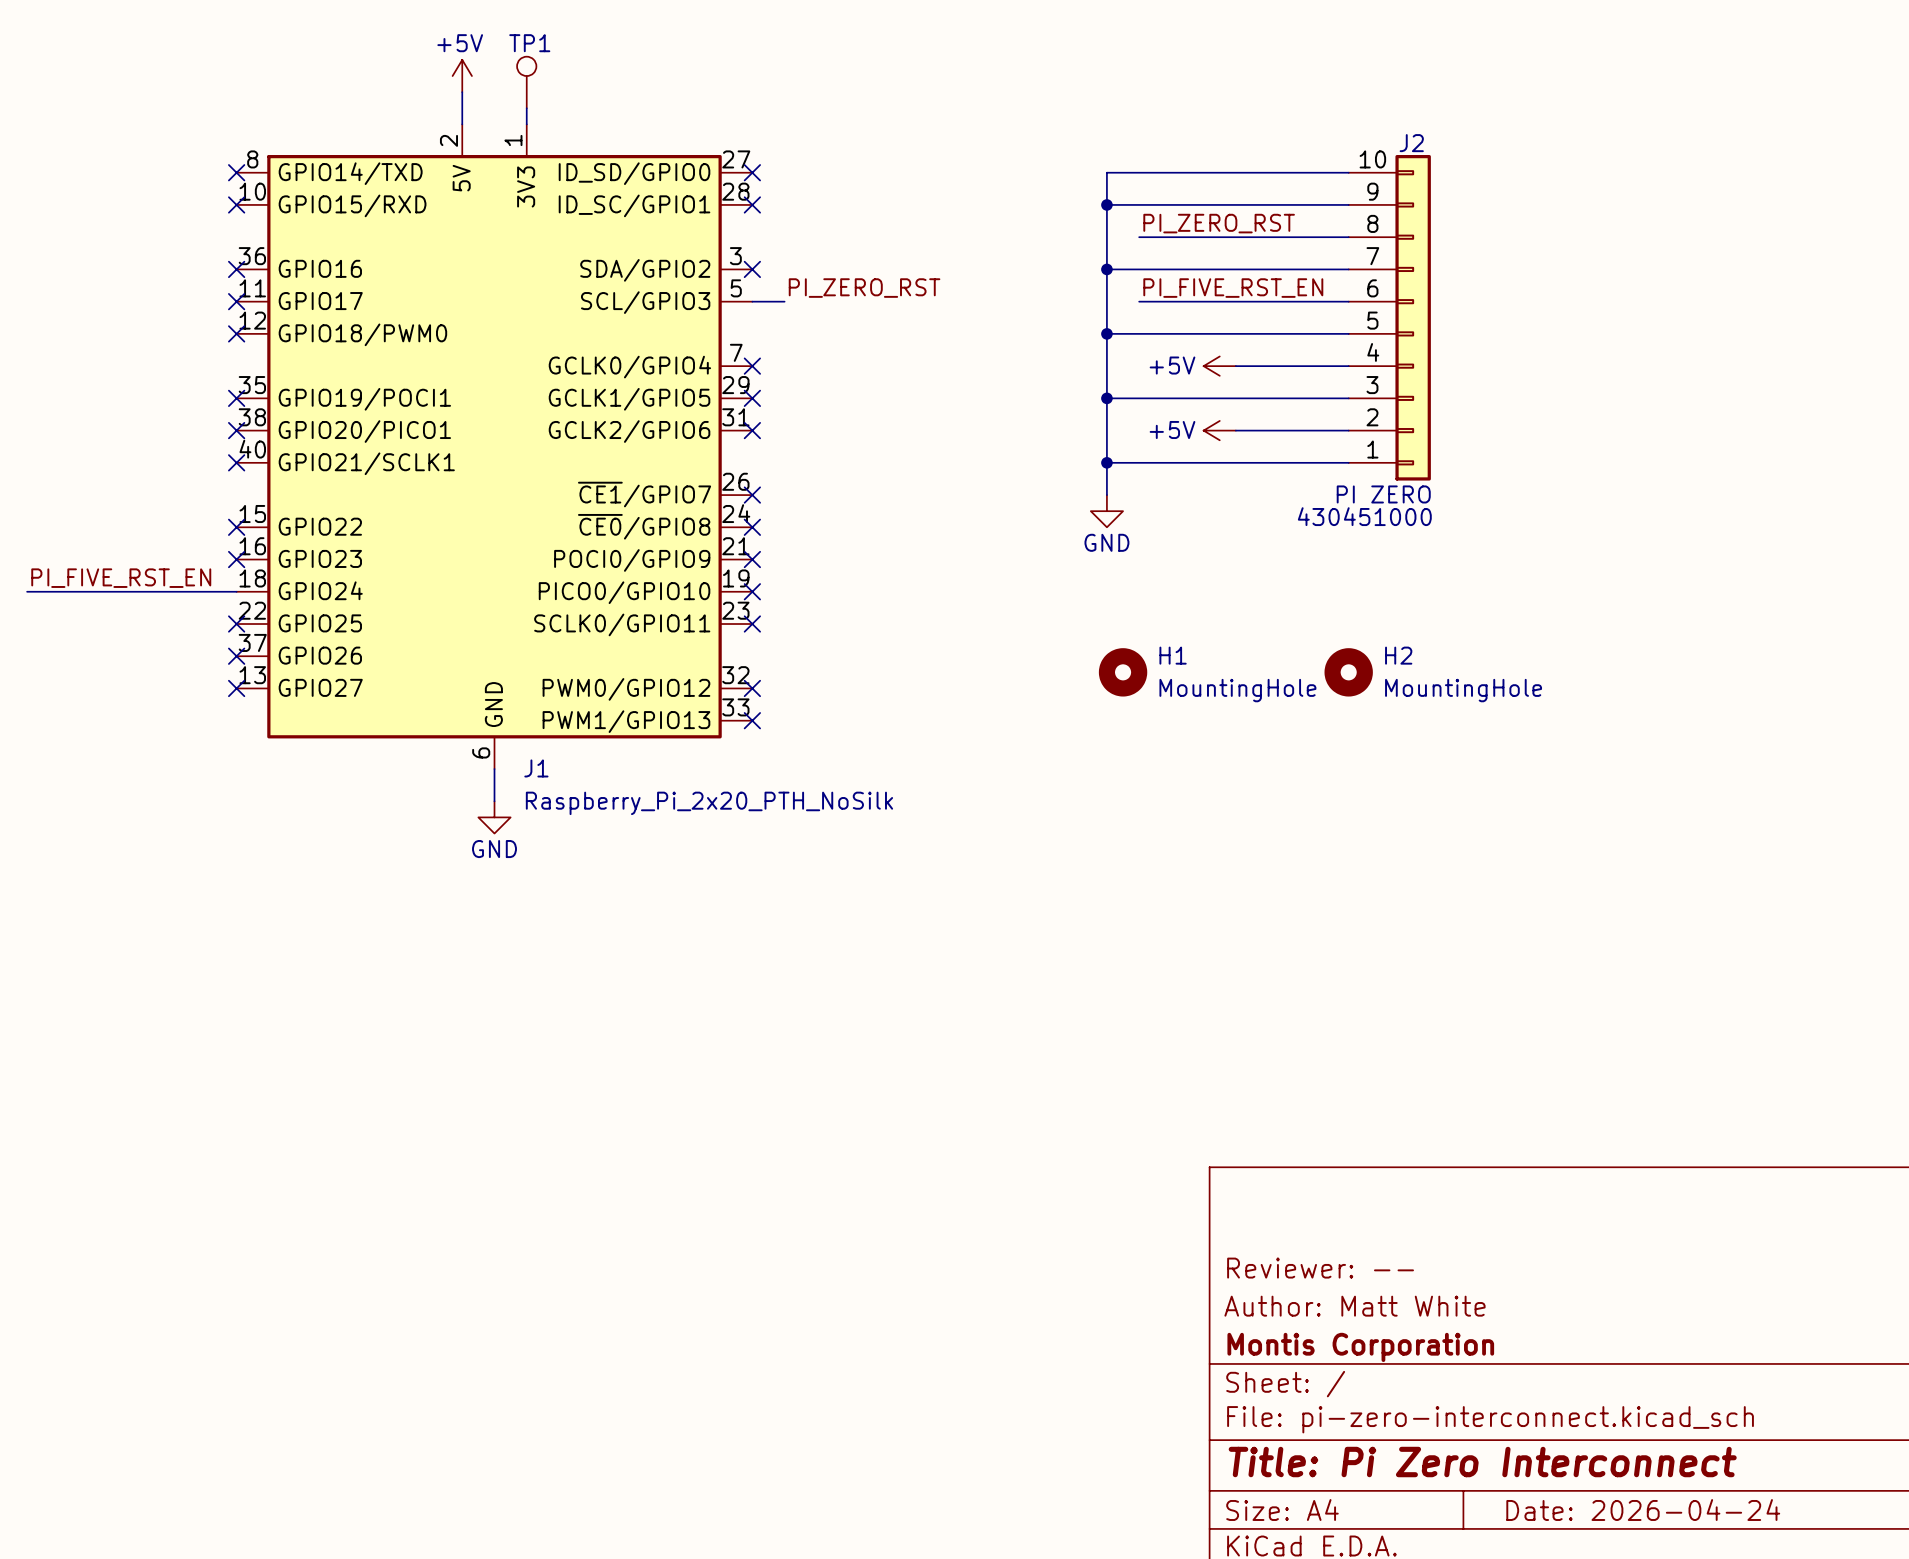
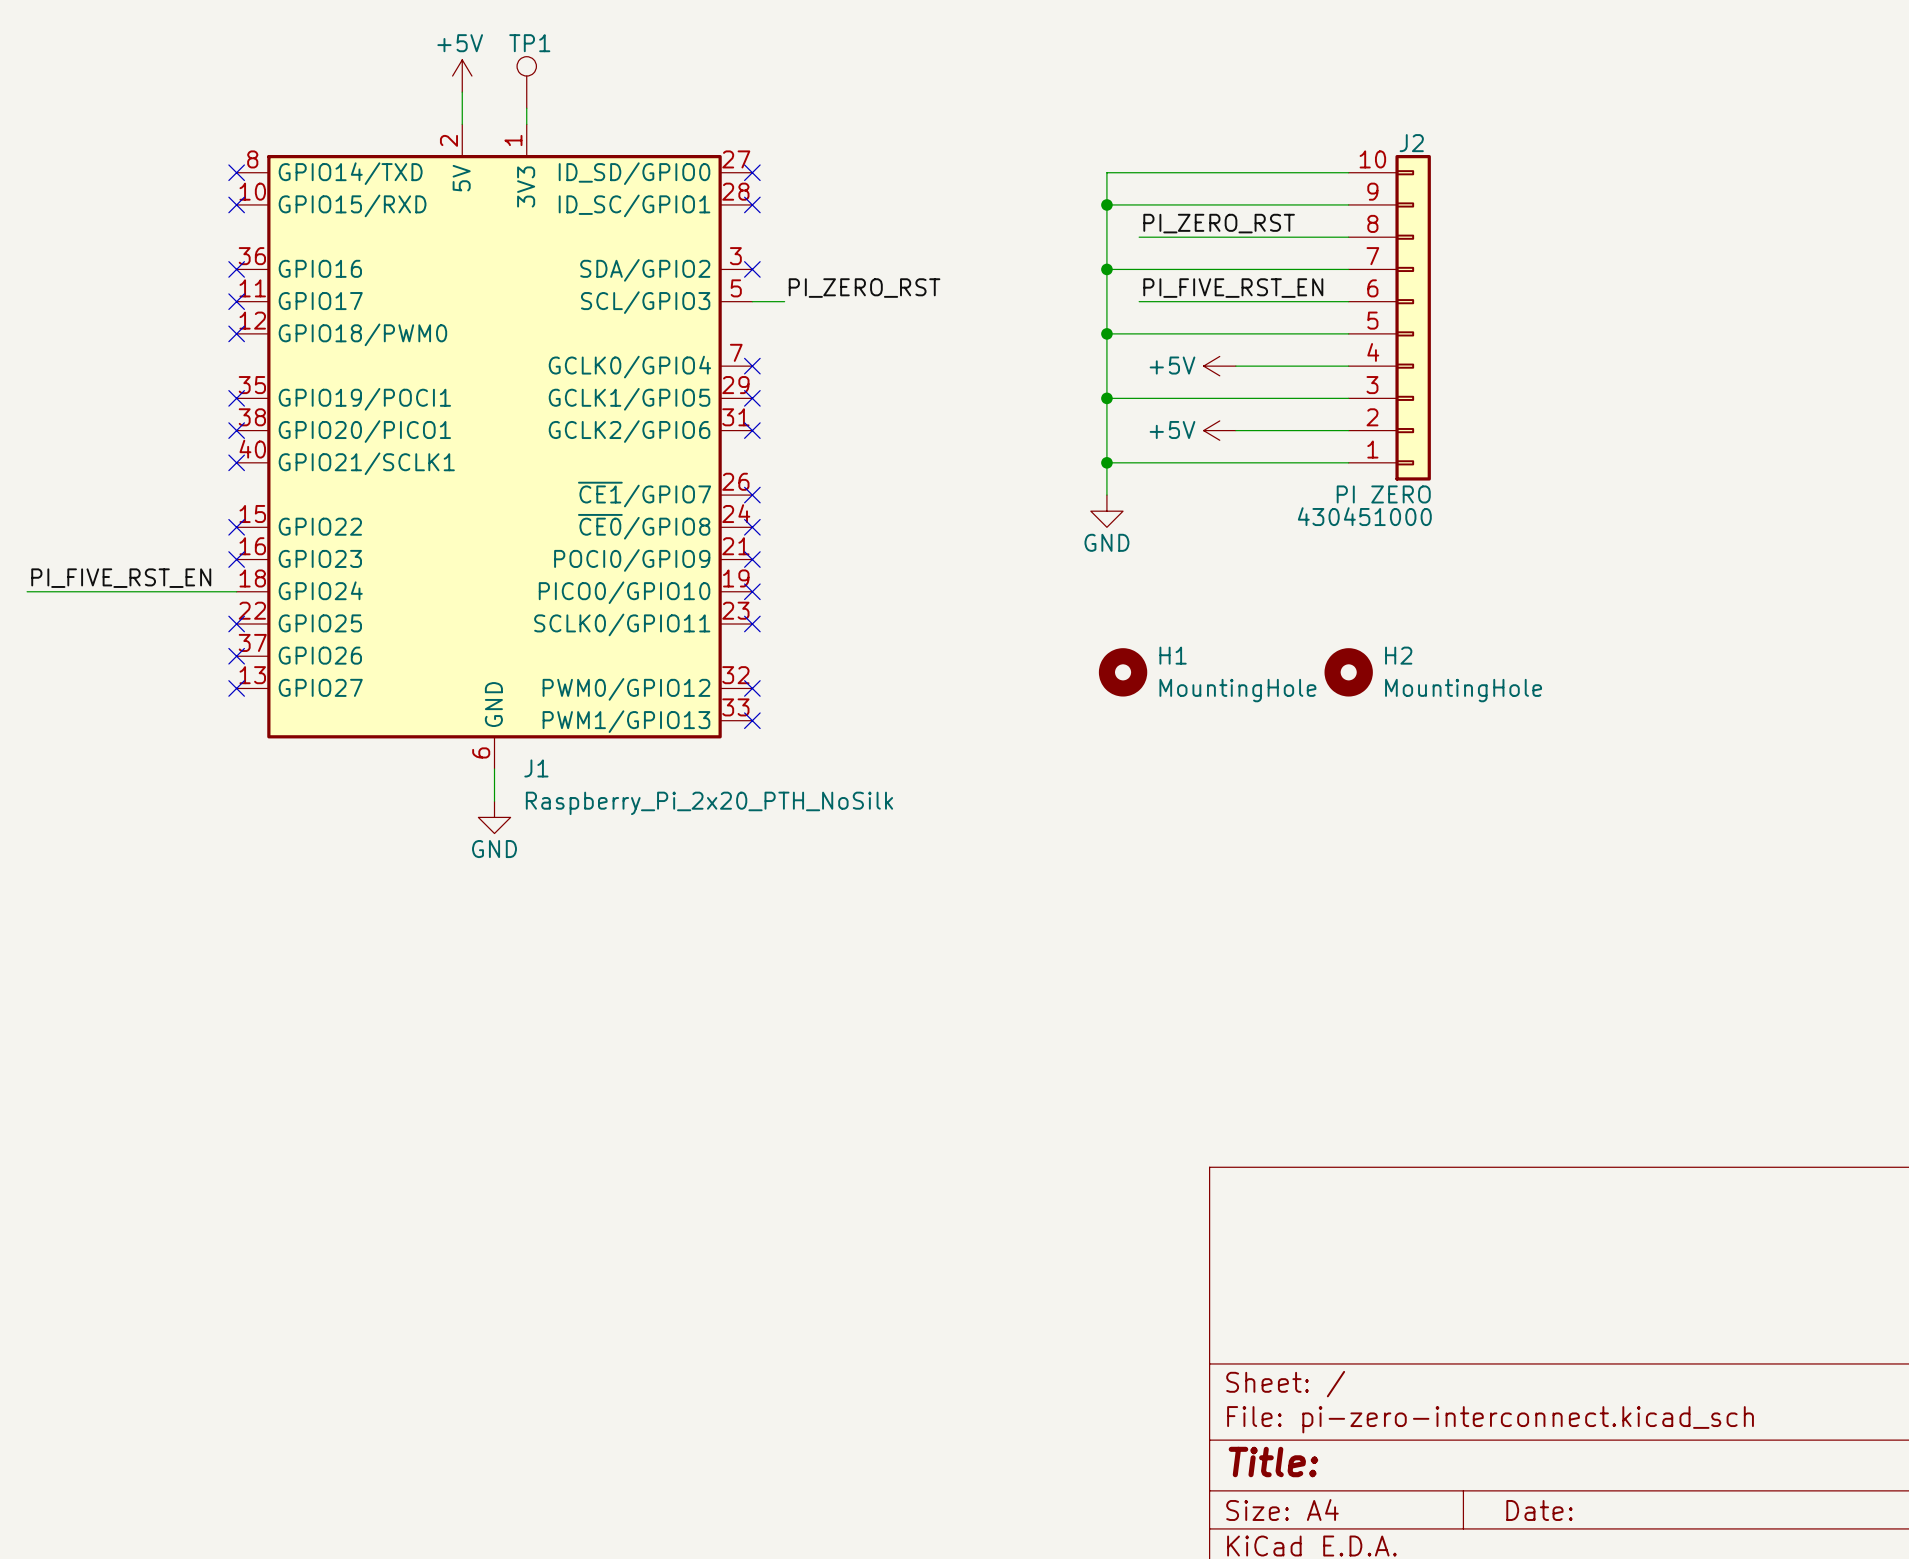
title block: Reviewer: -- (1320, 1268) -> none
title block: Author: Matt White (1355, 1306) -> none
title block: Montis Corporation (1360, 1347) -> none
title block: Title: Pi Zero Interconnect (1482, 1462) -> Title: (1273, 1462)
title block: Date: 2026-04-24 (1643, 1510) -> Date: (1539, 1510)

